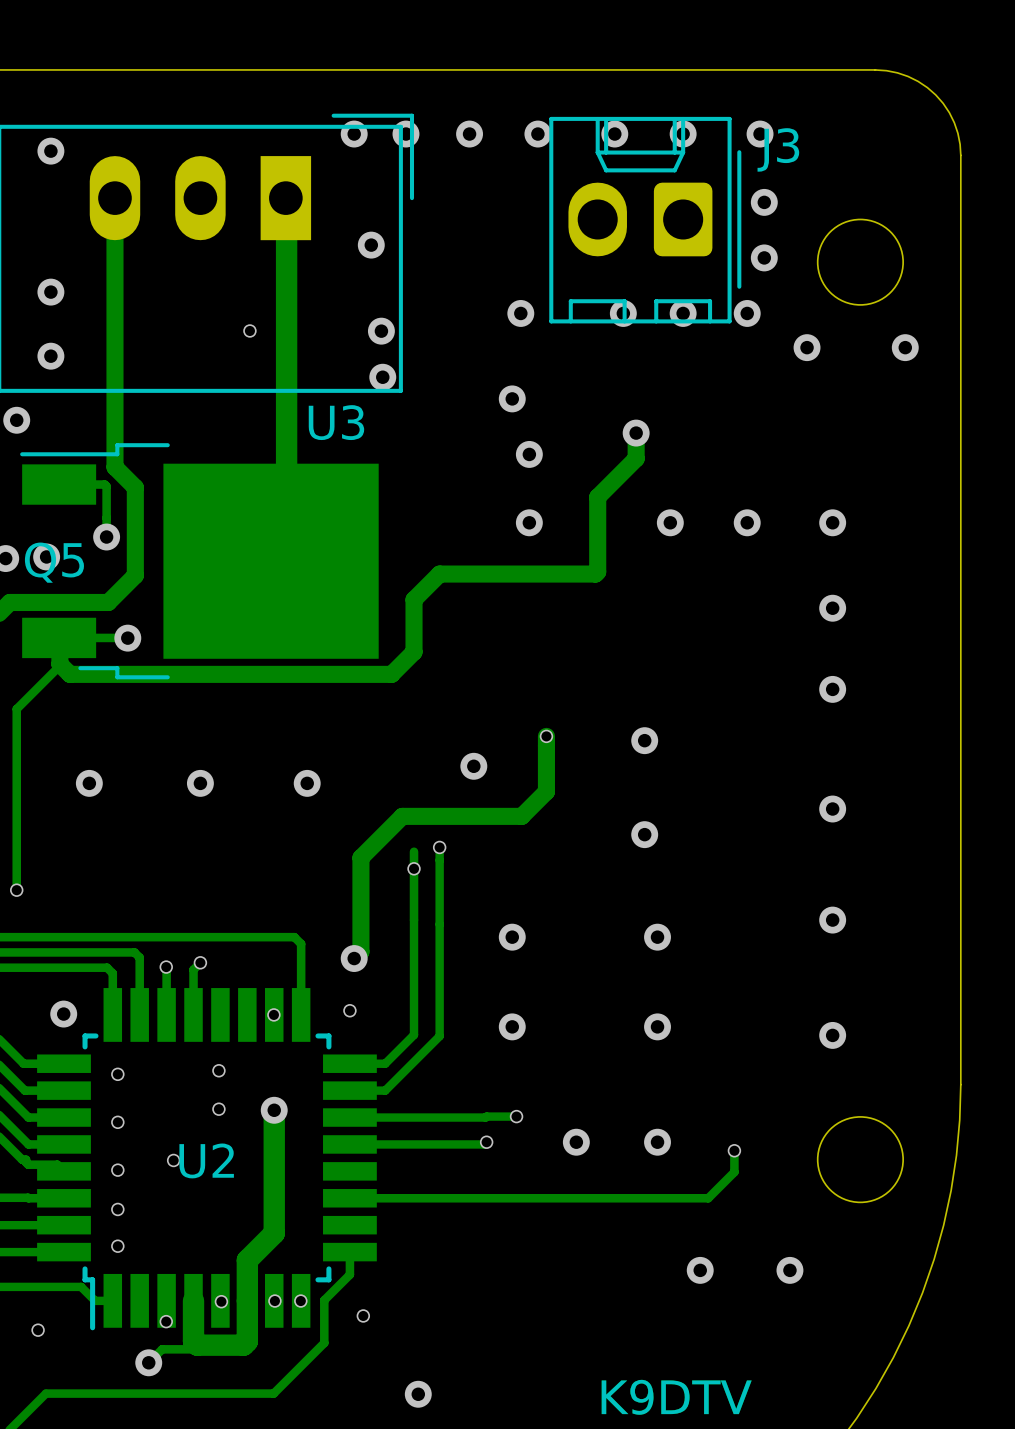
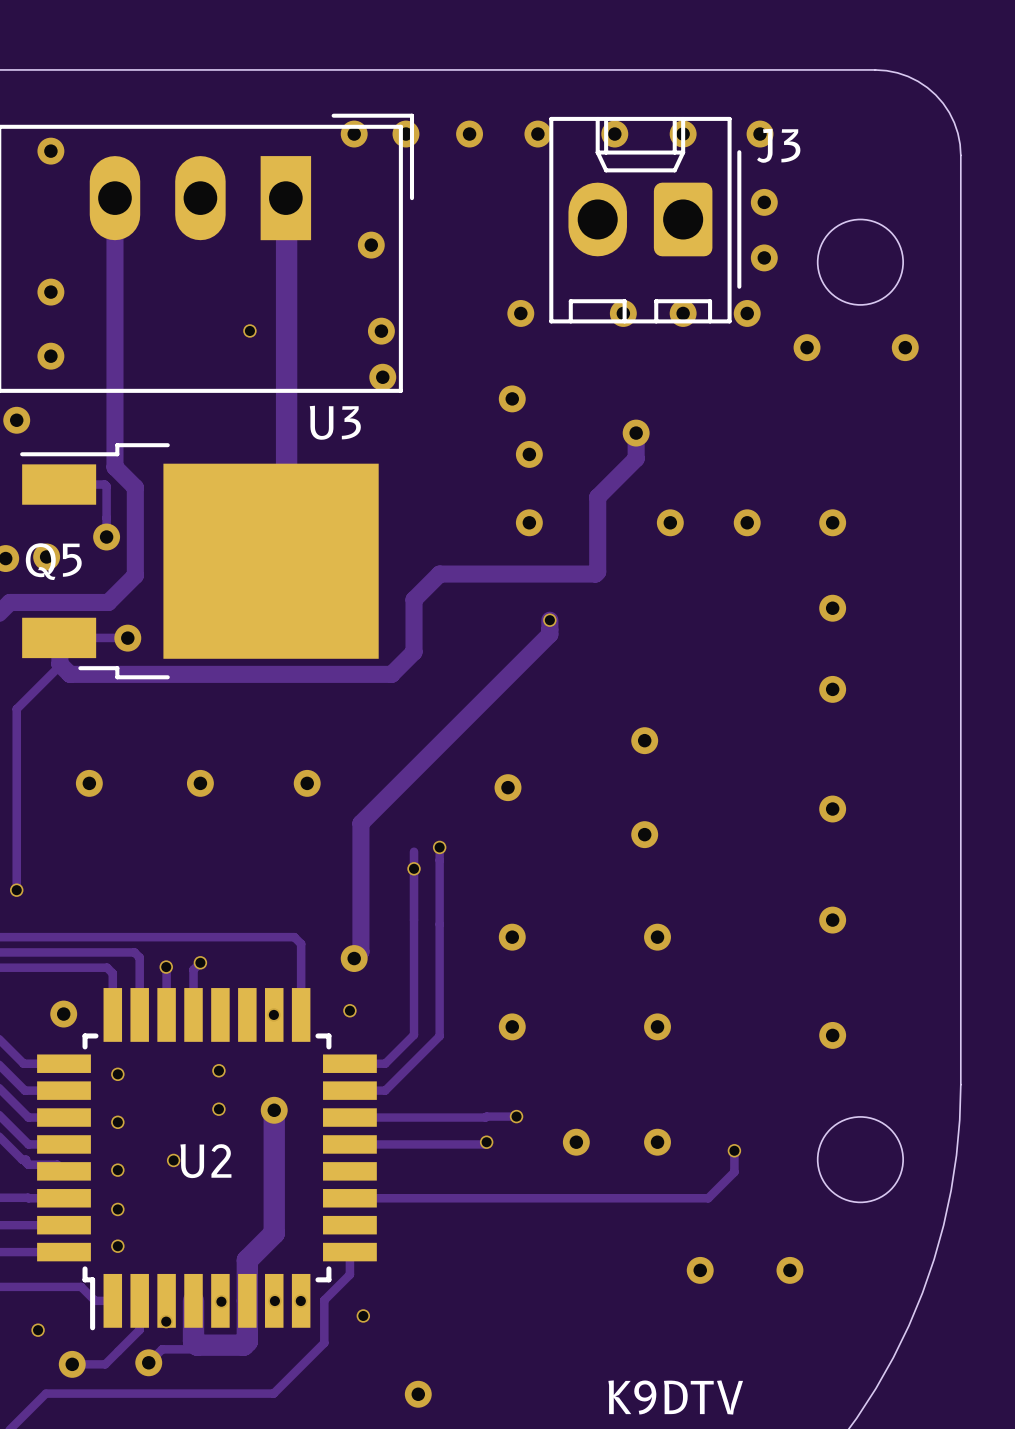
track: (546, 736) (546, 791) (521, 816) (402, 816) (360, 857) -> (549, 620) (549, 634) (360, 823) (360, 857)
via position: (546, 736) -> (549, 620)
via position: (473, 766) -> (508, 787)
track: none -> (139, 1300) (139, 1329) (105, 1364) (72, 1364)
via: none -> (72, 1364)

